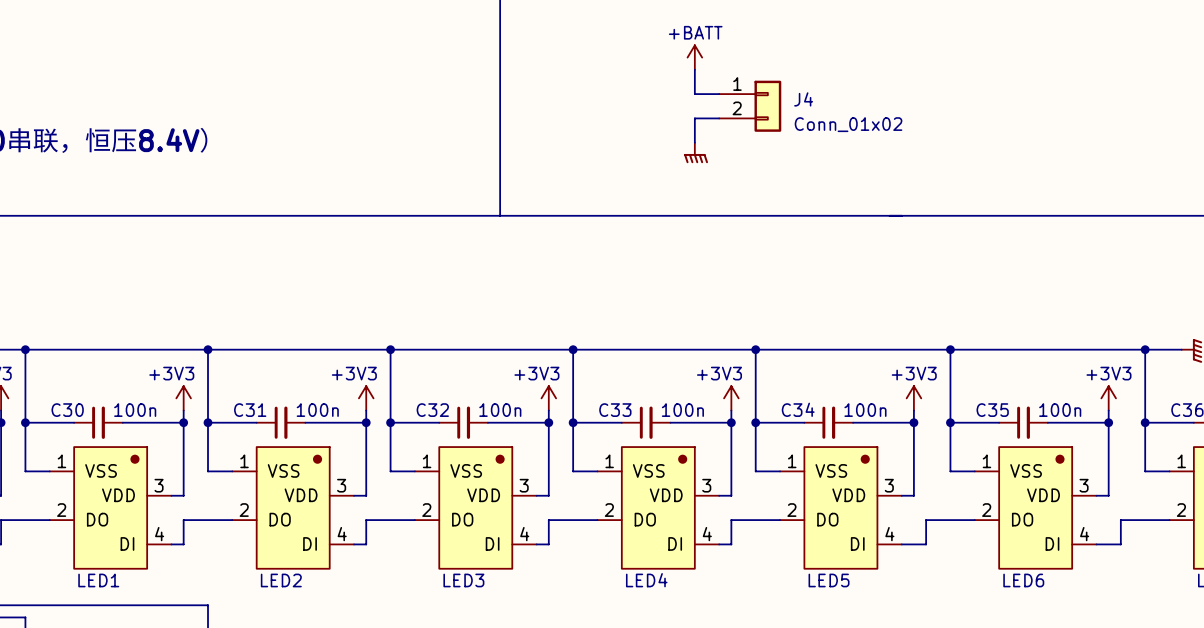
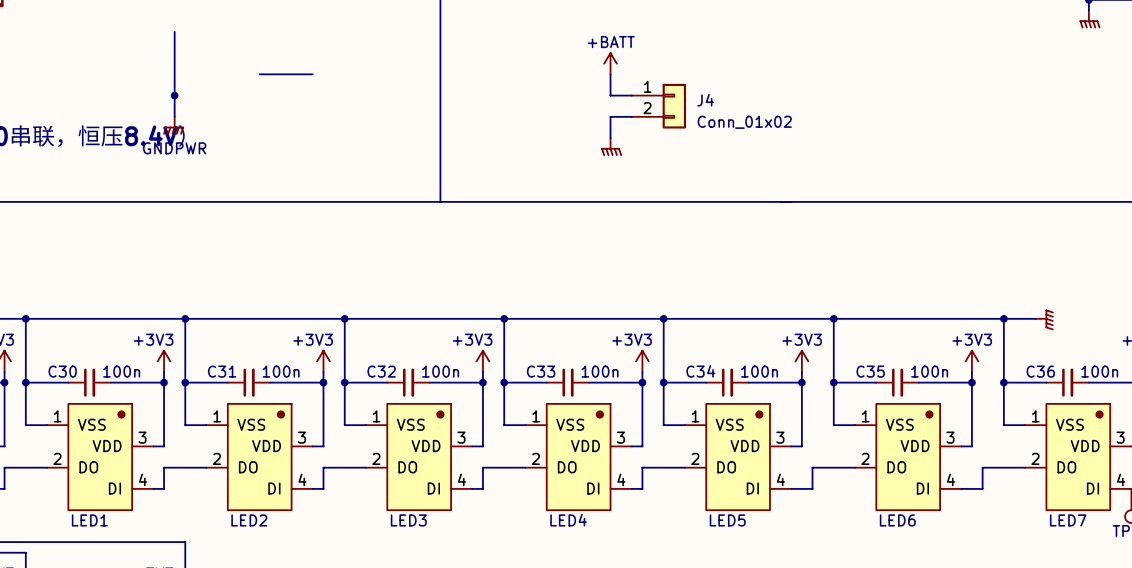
wire: none -> (174, 31) (174, 116)
wire: none -> (259, 74) (312, 74)
junction: none -> (174, 95)
power symbol: none -> GNDPWR (173, 125)

